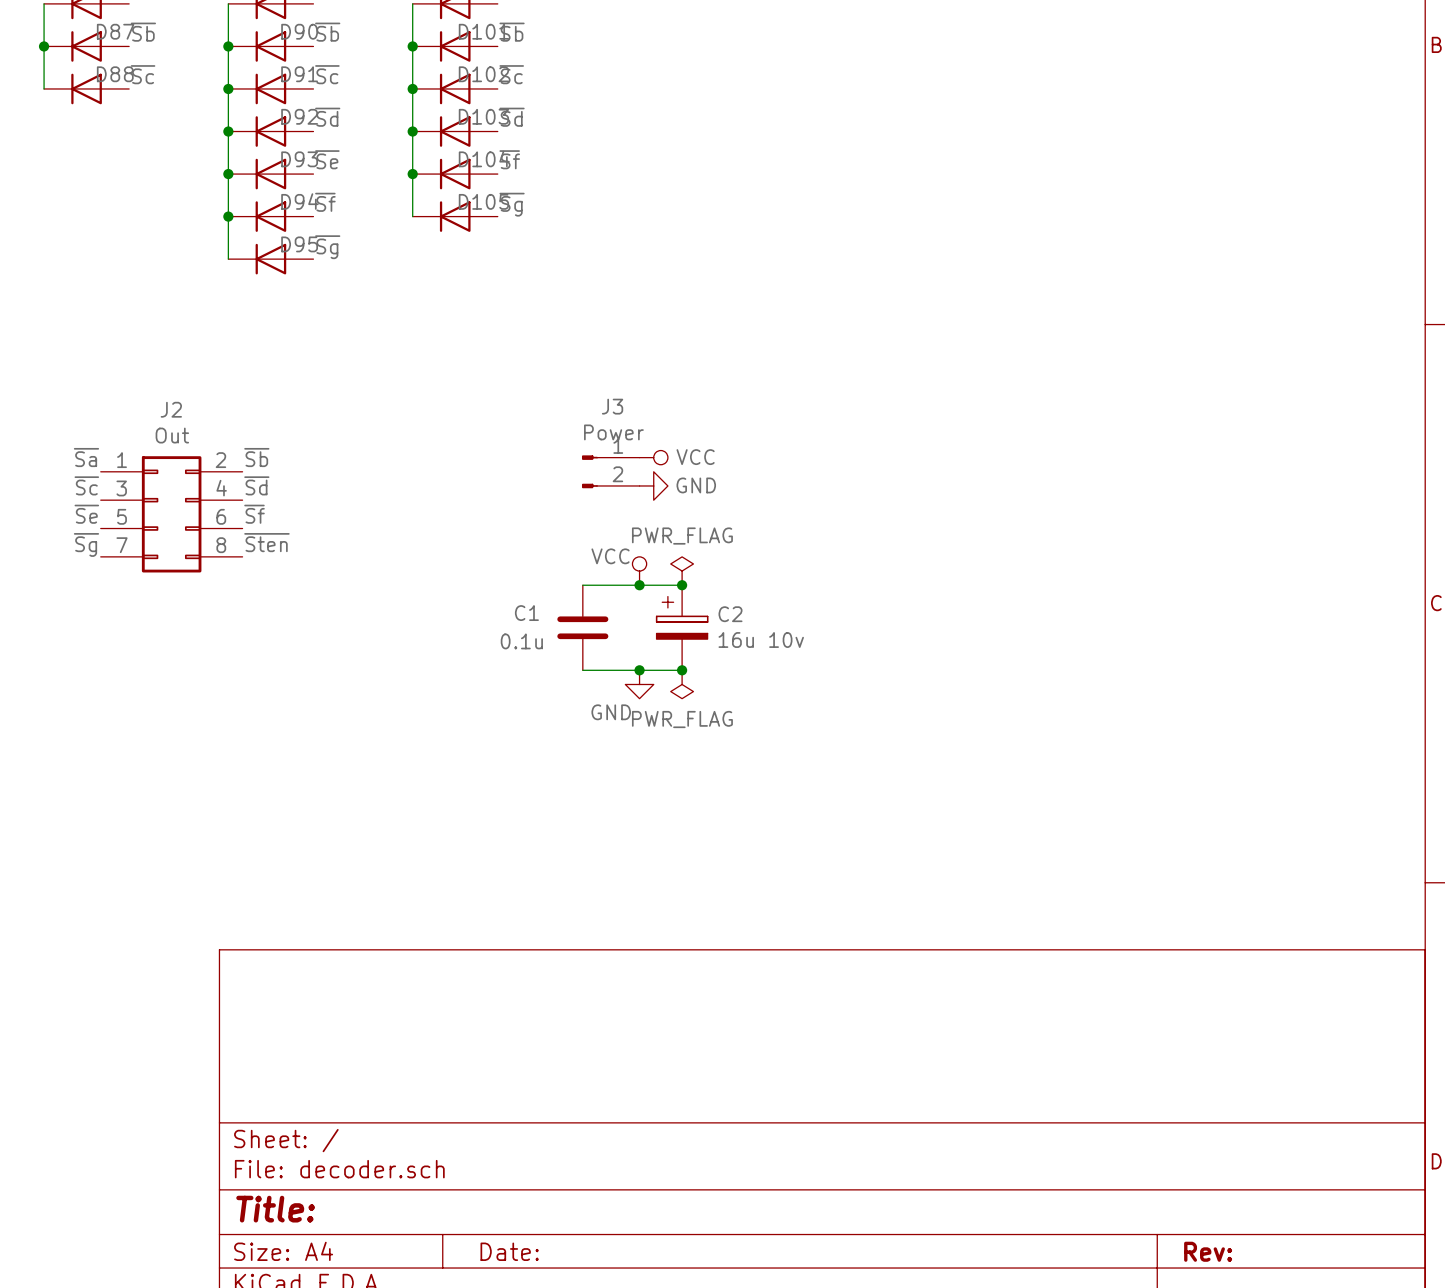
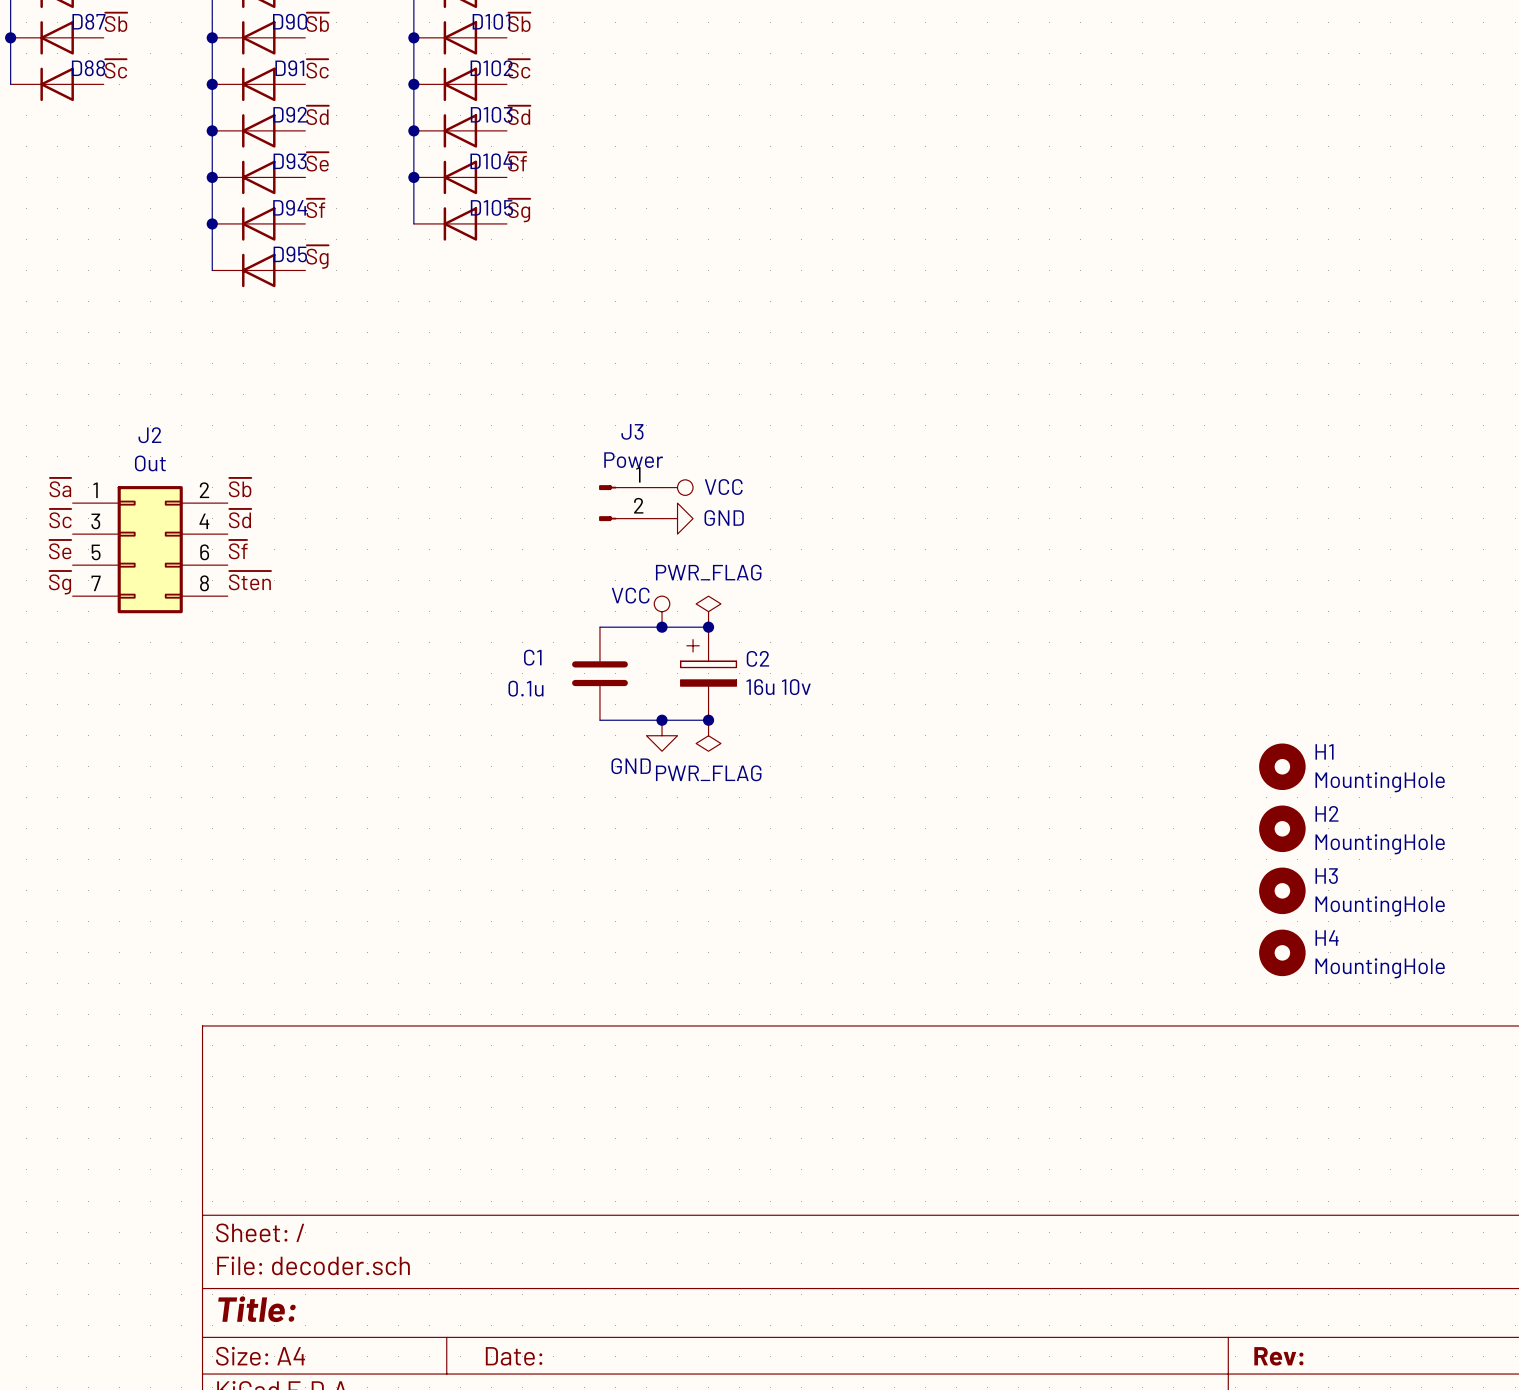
H1: none -> MountingHole (1282, 766)
H2: none -> MountingHole (1282, 828)
H3: none -> MountingHole (1282, 890)
H4: none -> MountingHole (1282, 952)

